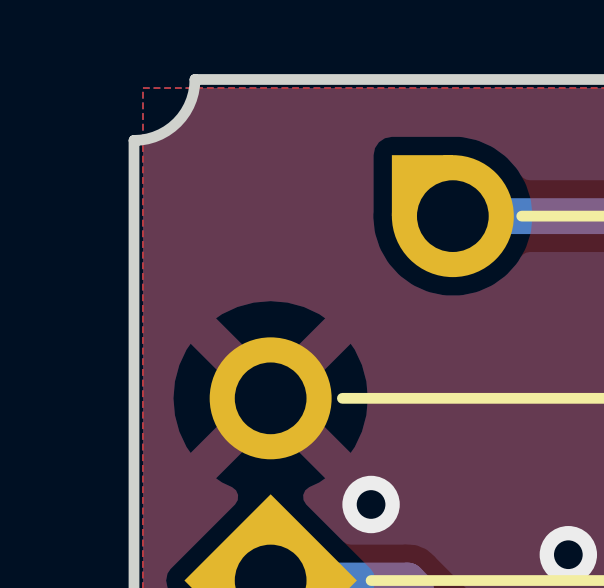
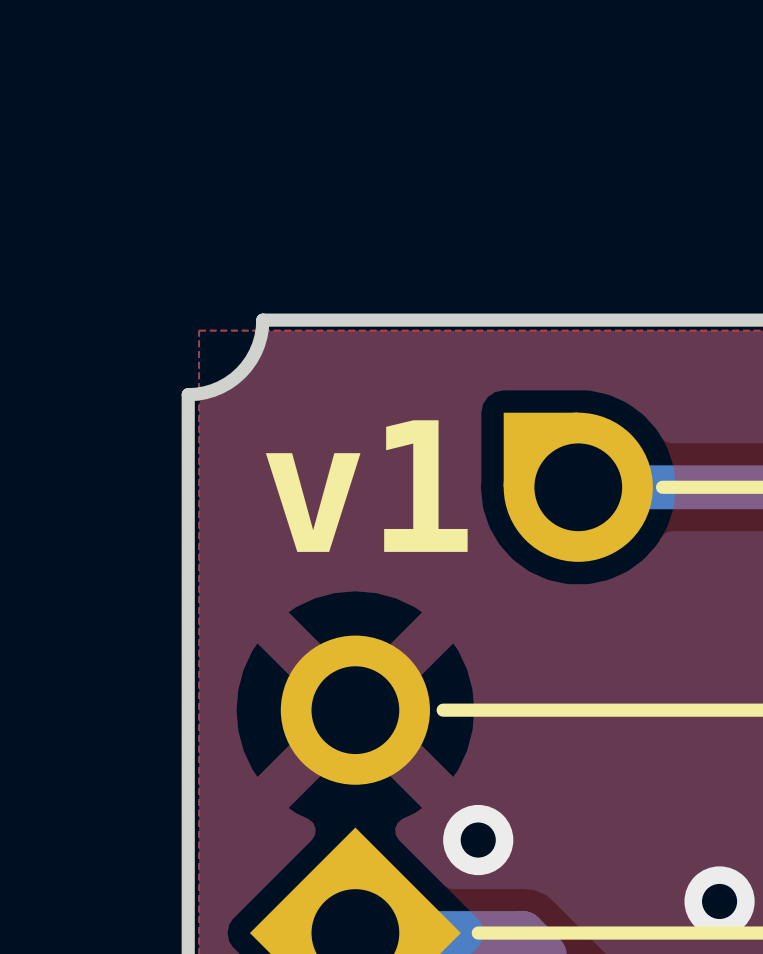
text: none -> v1 (366, 486)

